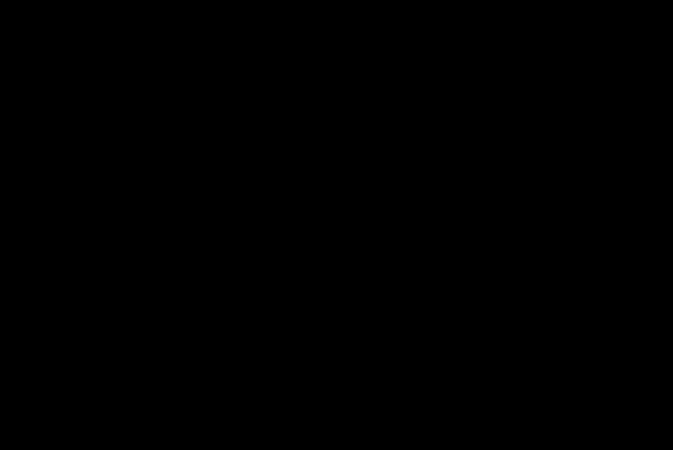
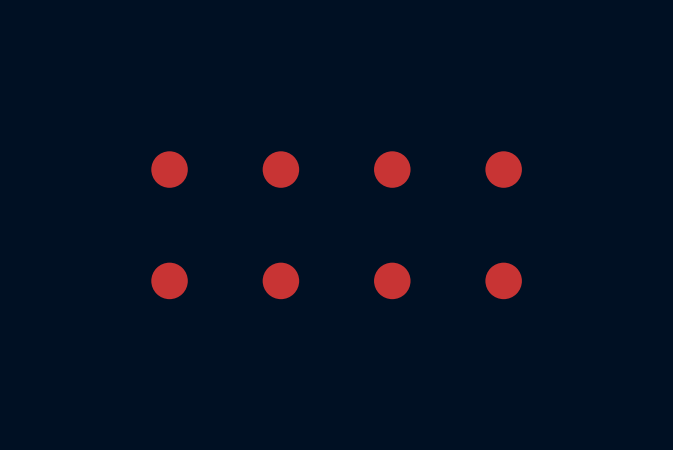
part: none -> (169, 169)
part: none -> (280, 169)
part: none -> (392, 169)
part: none -> (503, 169)
part: none -> (169, 280)
part: none -> (280, 280)
part: none -> (392, 280)
part: none -> (503, 280)

